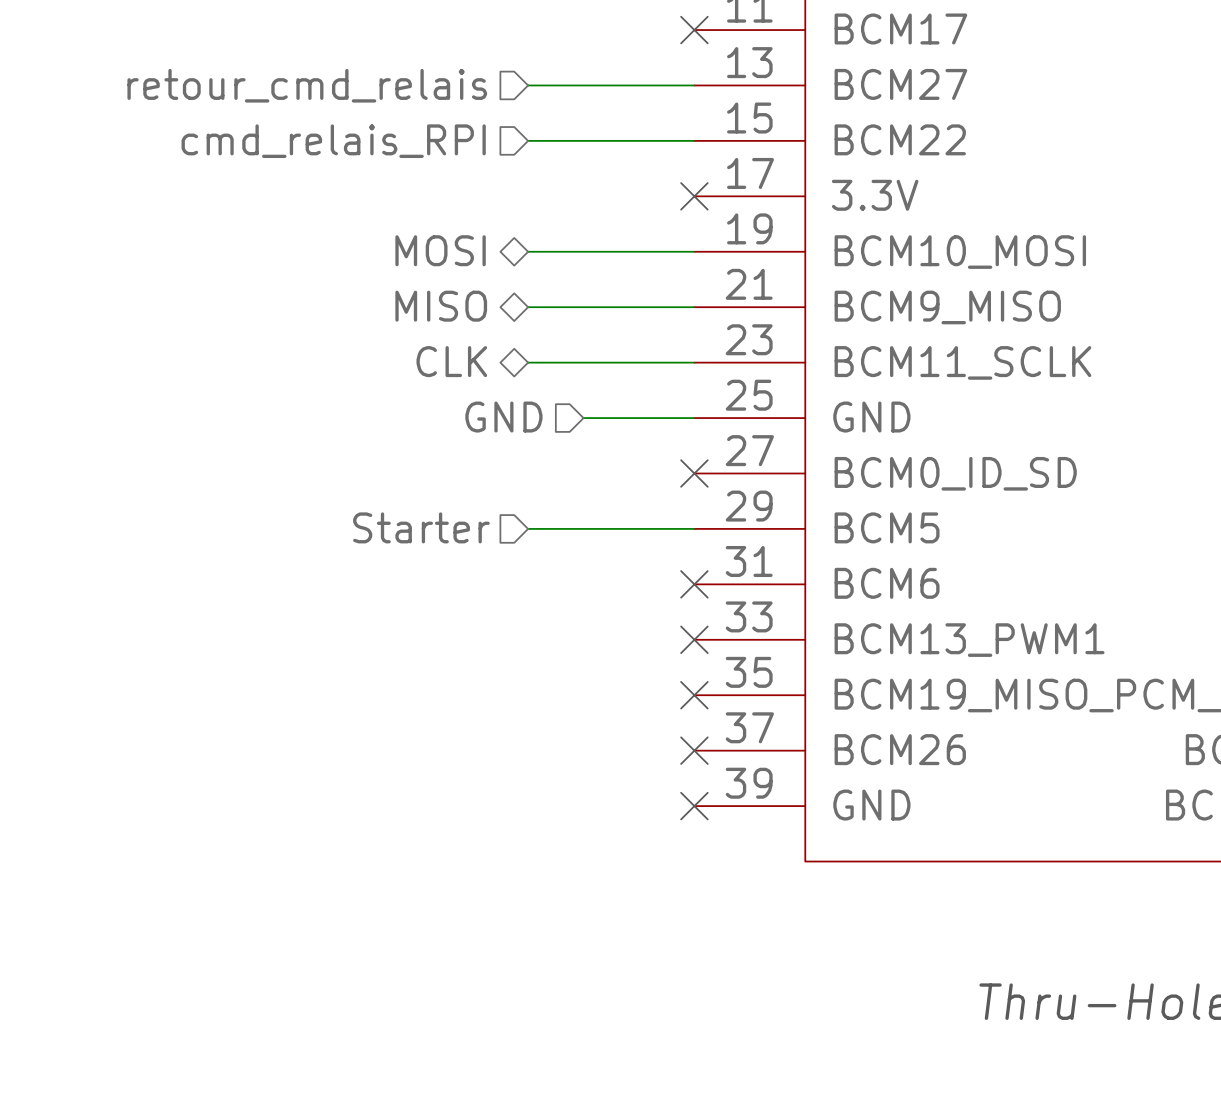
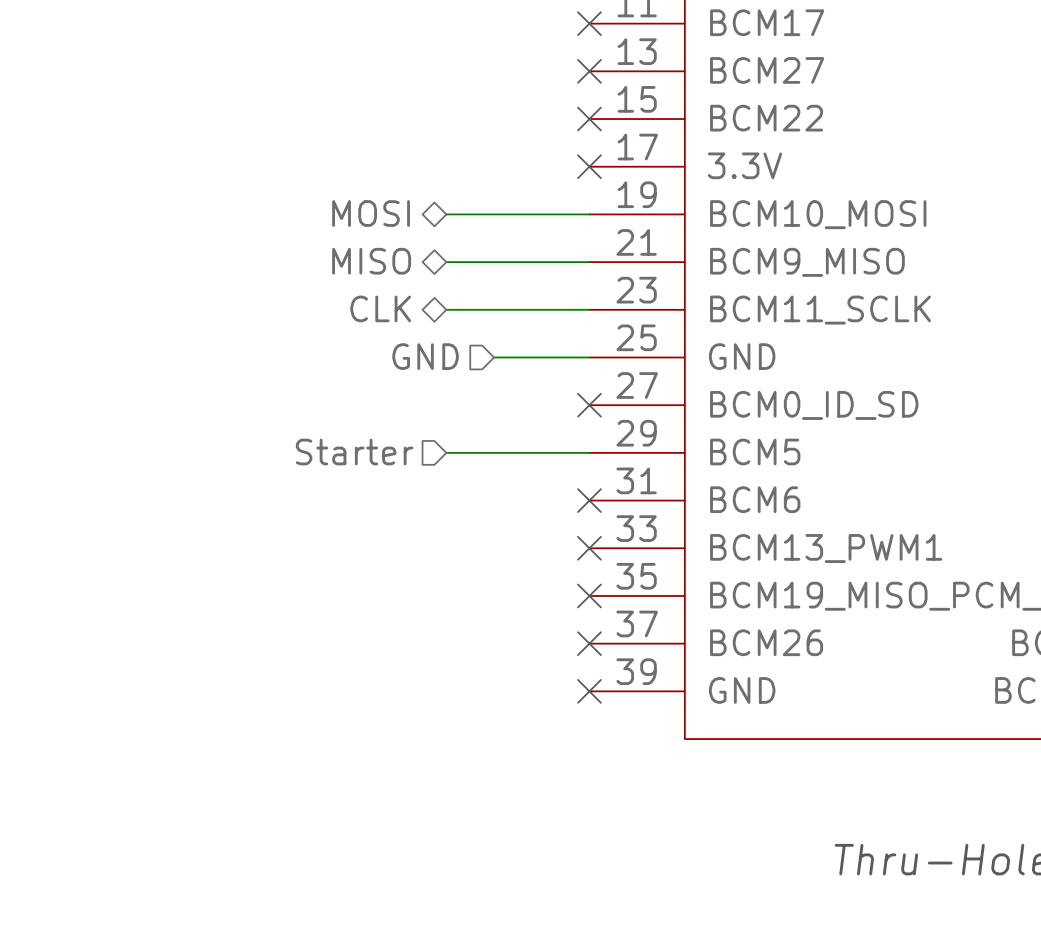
hierarchical label: retour_cmd_relais (307, 85) -> none
wire: (528, 85) (694, 85) -> none
no-connect mark: none -> (589, 71)
wire: (528, 140) (694, 140) -> none
no-connect mark: none -> (589, 119)
hierarchical label: cmd_relais_RPI (333, 141) -> none

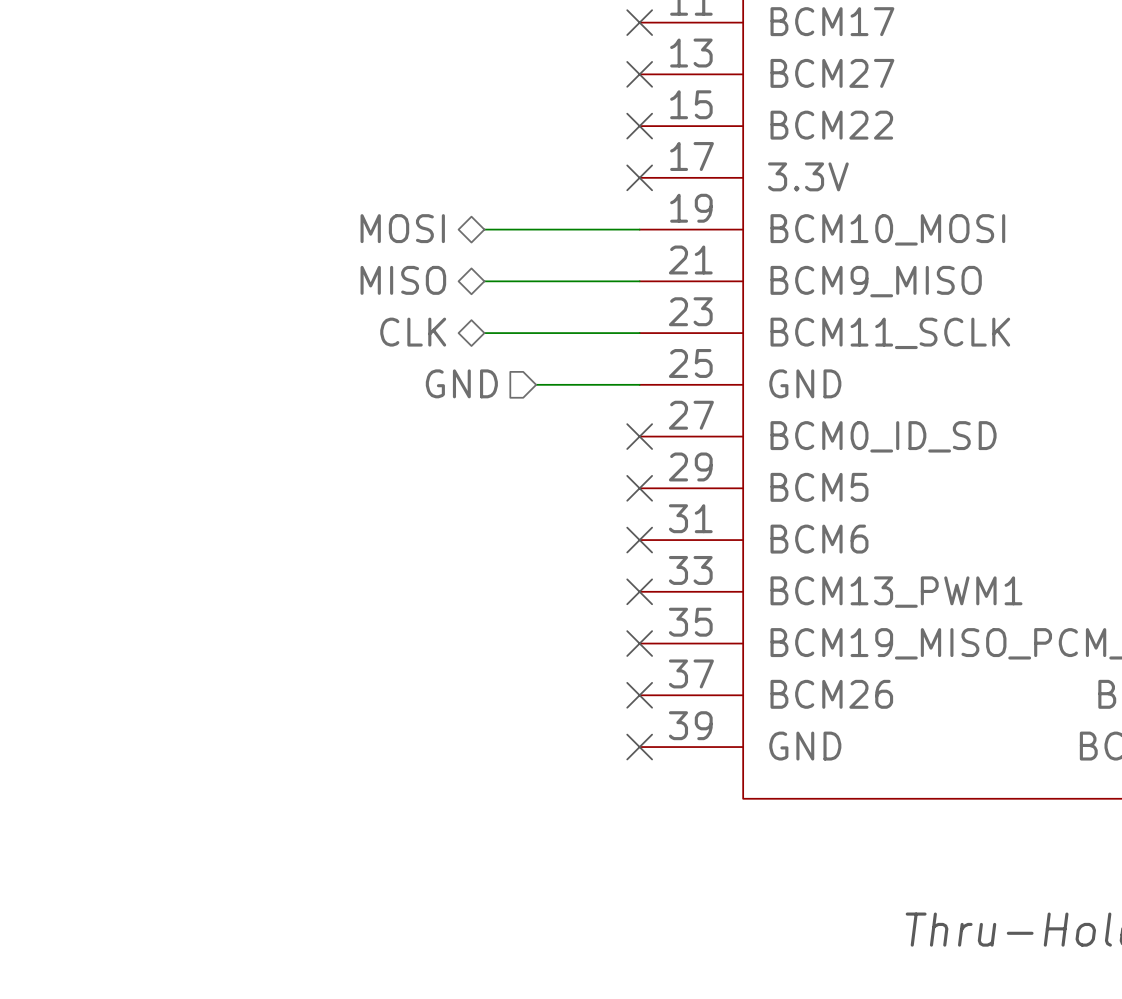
hierarchical label: Starter (354, 451) -> none
wire: (446, 452) (589, 452) -> none
no-connect mark: none -> (639, 488)

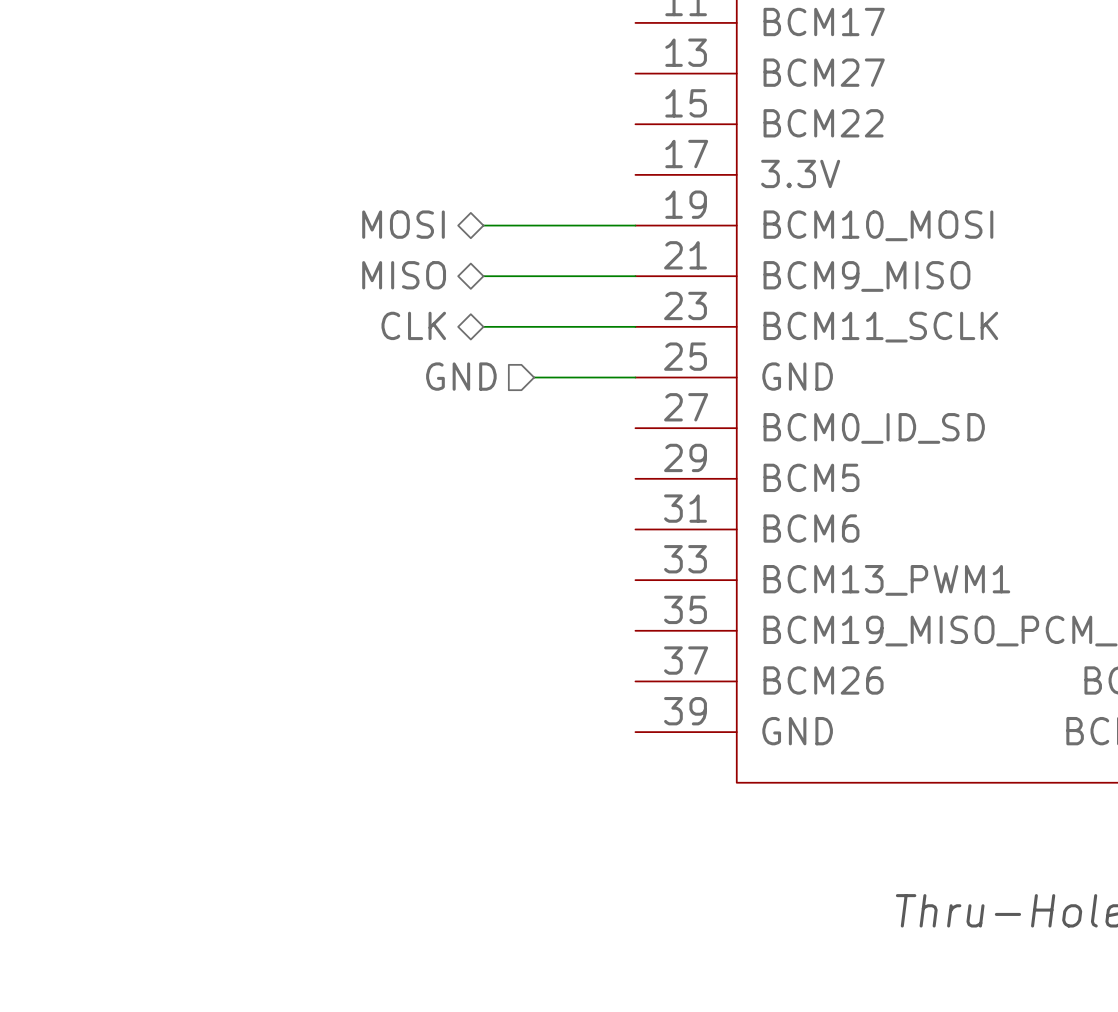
no-connect mark: (639, 22) -> none
no-connect mark: (639, 74) -> none
no-connect mark: (639, 126) -> none
no-connect mark: (639, 177) -> none
no-connect mark: (639, 436) -> none
no-connect mark: (639, 488) -> none
no-connect mark: (639, 540) -> none
no-connect mark: (639, 591) -> none
no-connect mark: (639, 643) -> none
no-connect mark: (639, 695) -> none
no-connect mark: (639, 747) -> none

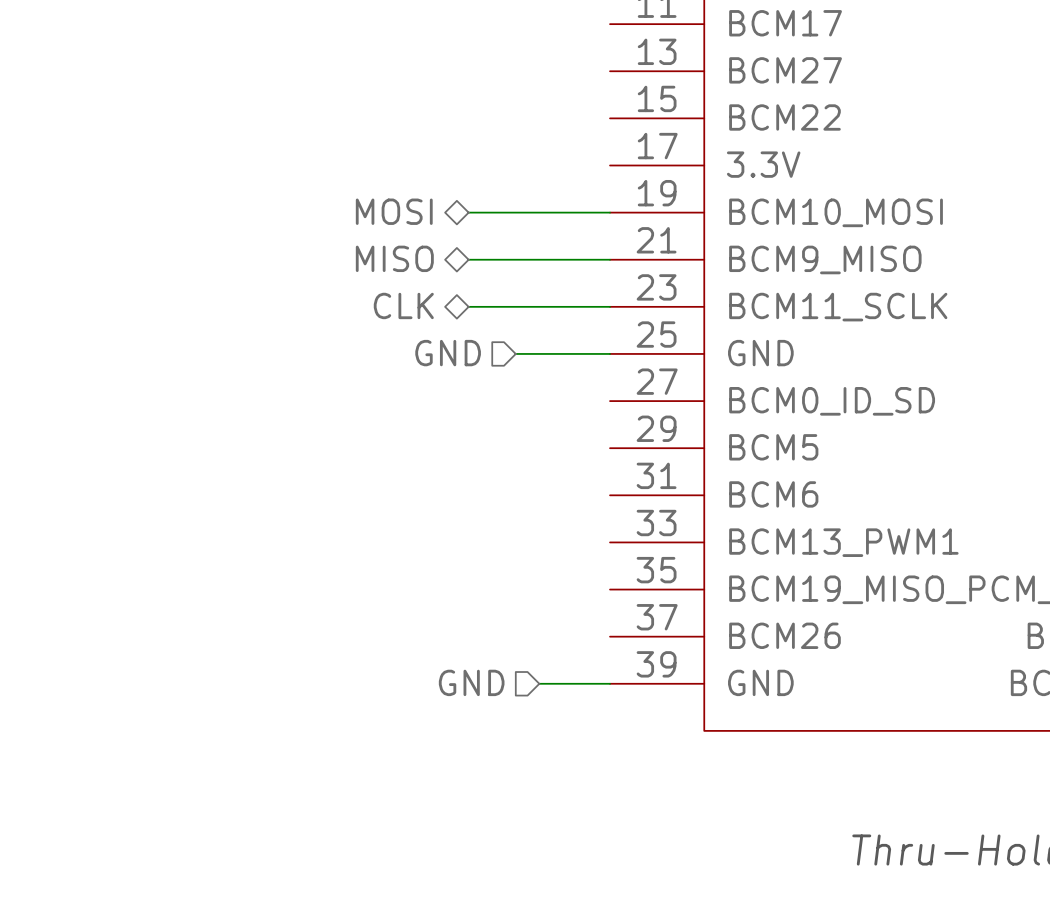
hierarchical label: none -> GND (471, 682)
wire: none -> (539, 683) (610, 683)

